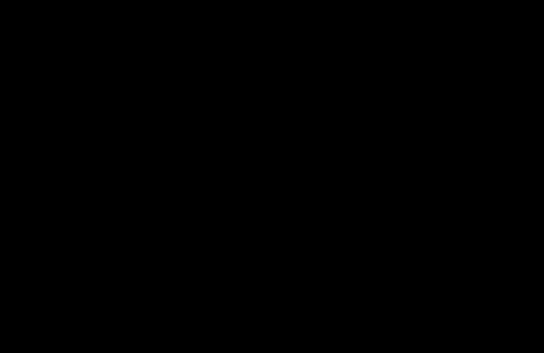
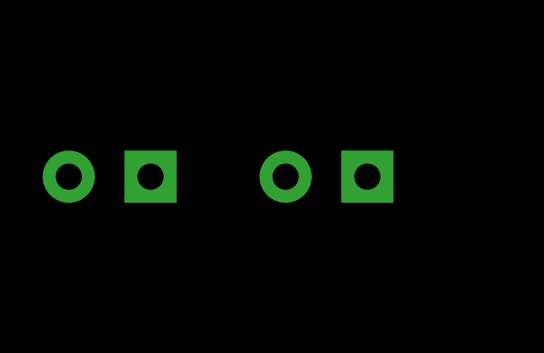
part: none -> (109, 176)
part: none -> (326, 176)

